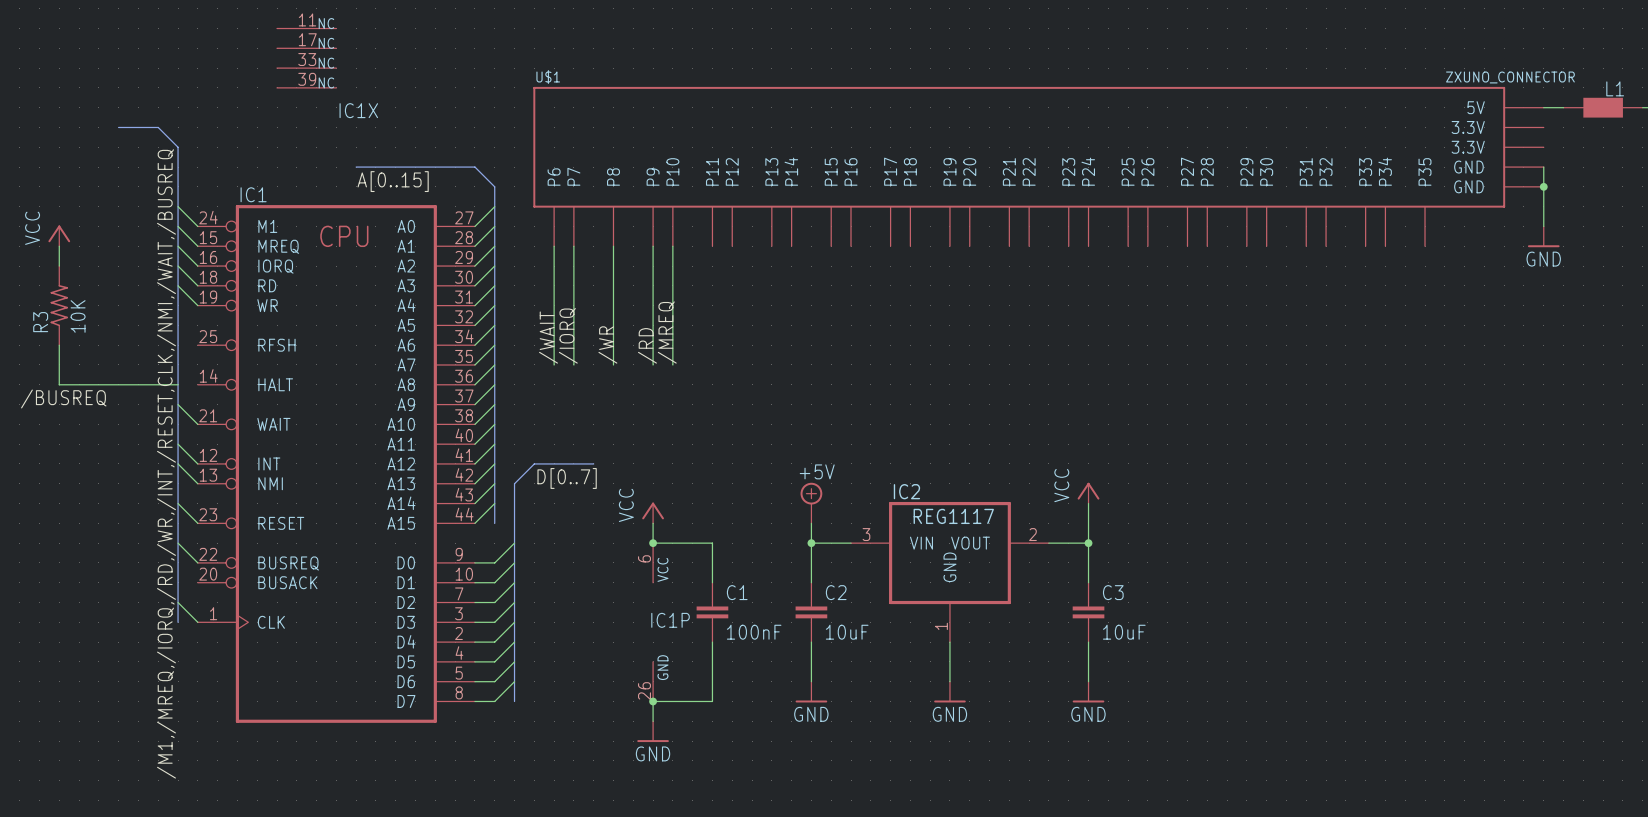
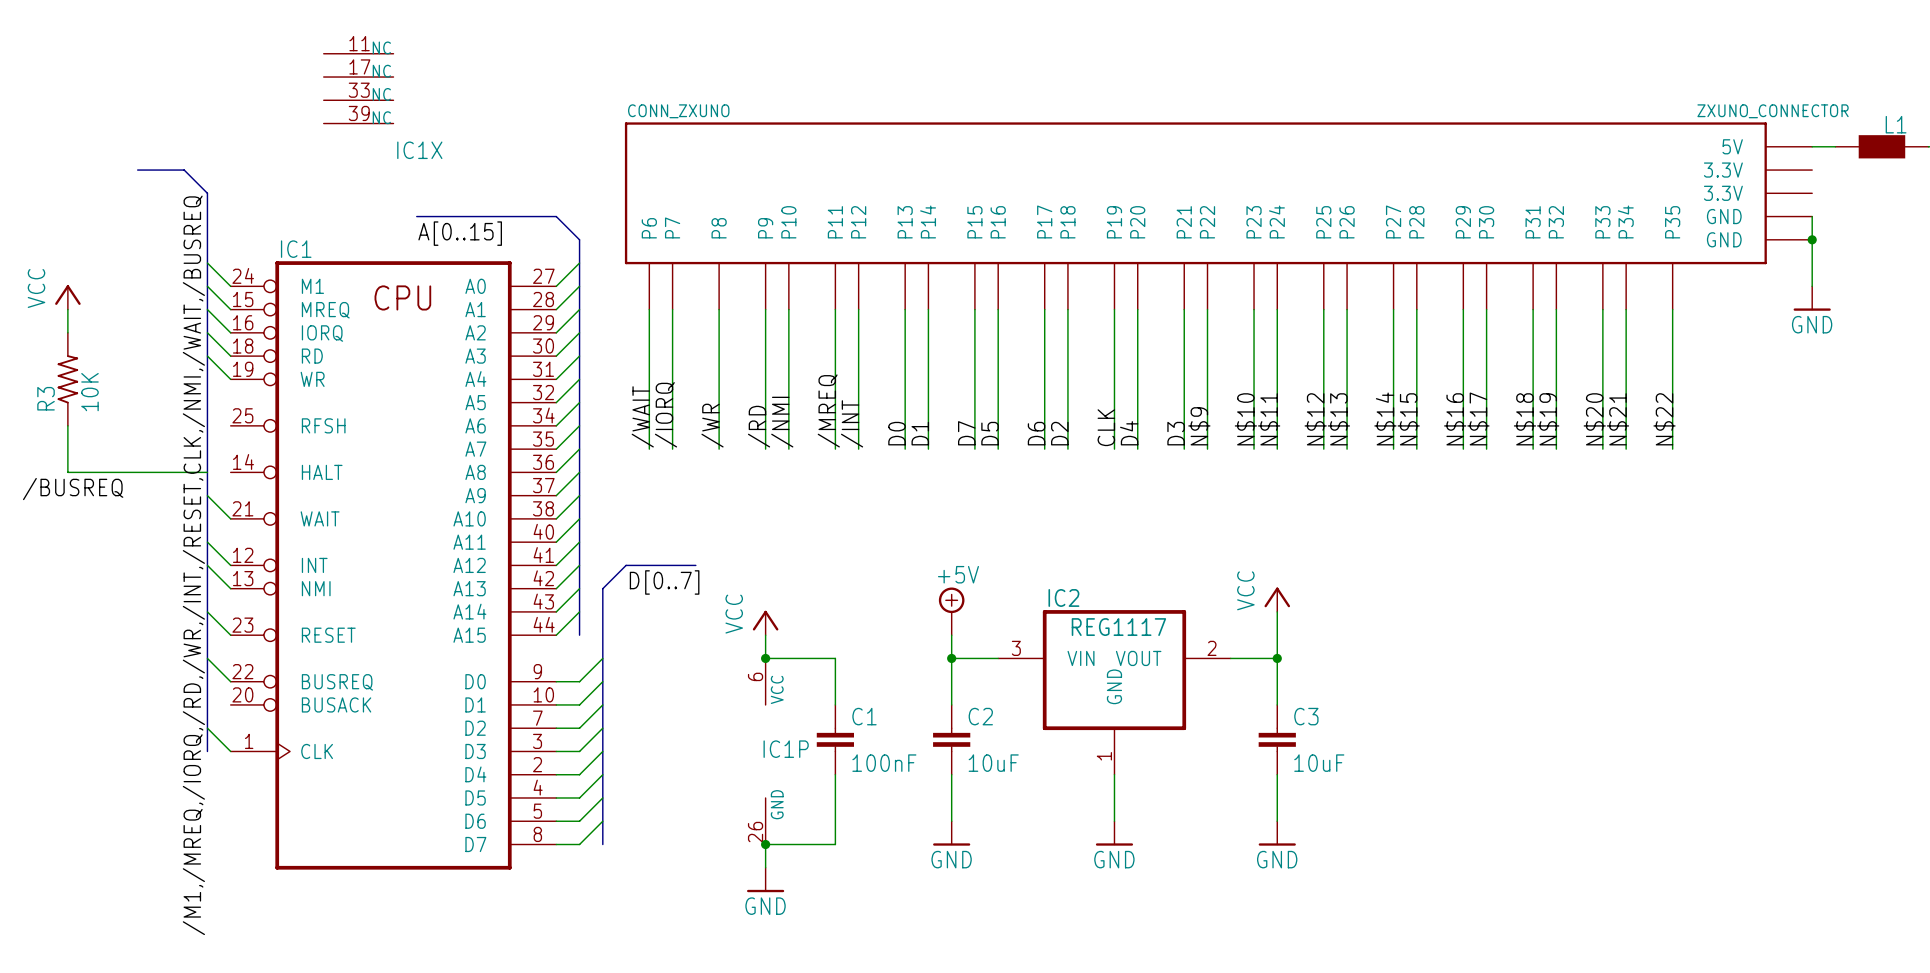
U$1 name: U$1 (548, 77) -> CONN_ZXUNO (678, 111)
wire: none -> (835, 309) (835, 449)
wire: none -> (858, 309) (858, 449)
wire: none -> (905, 309) (905, 449)
wire: none -> (928, 309) (928, 449)
wire: none -> (974, 309) (974, 449)
wire: none -> (998, 309) (998, 449)
wire: none -> (1044, 309) (1044, 449)
wire: none -> (1067, 309) (1067, 449)
wire: none -> (1114, 309) (1114, 449)
wire: none -> (1137, 309) (1137, 449)
wire: none -> (1184, 309) (1184, 449)
wire: none -> (1207, 309) (1207, 449)
wire: none -> (1254, 309) (1254, 449)
wire: none -> (1277, 309) (1277, 449)
wire: none -> (1323, 309) (1323, 449)
wire: none -> (1347, 309) (1347, 449)
wire: none -> (1393, 309) (1393, 449)
wire: none -> (1416, 309) (1416, 449)
wire: none -> (1463, 309) (1463, 449)
wire: none -> (1486, 309) (1486, 449)
wire: none -> (1533, 309) (1533, 449)
wire: none -> (1556, 309) (1556, 449)
wire: none -> (1602, 309) (1602, 449)
wire: none -> (1626, 309) (1626, 449)
wire: none -> (1672, 309) (1672, 449)
label: /MREQ (667, 332) -> /NMI (782, 422)
label: none -> /MREQ (828, 410)
label: none -> N$10 (1245, 419)
label: none -> N$11 (1269, 419)
label: none -> N$12 (1315, 419)
label: none -> N$13 (1338, 419)
label: none -> N$14 (1385, 418)
label: none -> N$15 (1408, 419)
label: none -> N$16 (1455, 419)
label: none -> N$17 (1478, 418)
label: none -> N$18 (1524, 419)
label: none -> N$19 (1548, 419)
label: none -> N$20 (1594, 419)
label: none -> N$21 (1617, 419)
label: none -> N$22 (1664, 419)
label: none -> /INT (852, 423)
label: none -> N$9 (1199, 426)
label: none -> CLK (1106, 427)
label: none -> D0 (897, 433)
label: none -> D1 (920, 433)
label: none -> D7 (966, 433)
label: none -> D5 (990, 433)
label: none -> D6 (1036, 433)
label: none -> D2 (1059, 433)
label: none -> D4 (1129, 433)
label: none -> D3 (1176, 433)

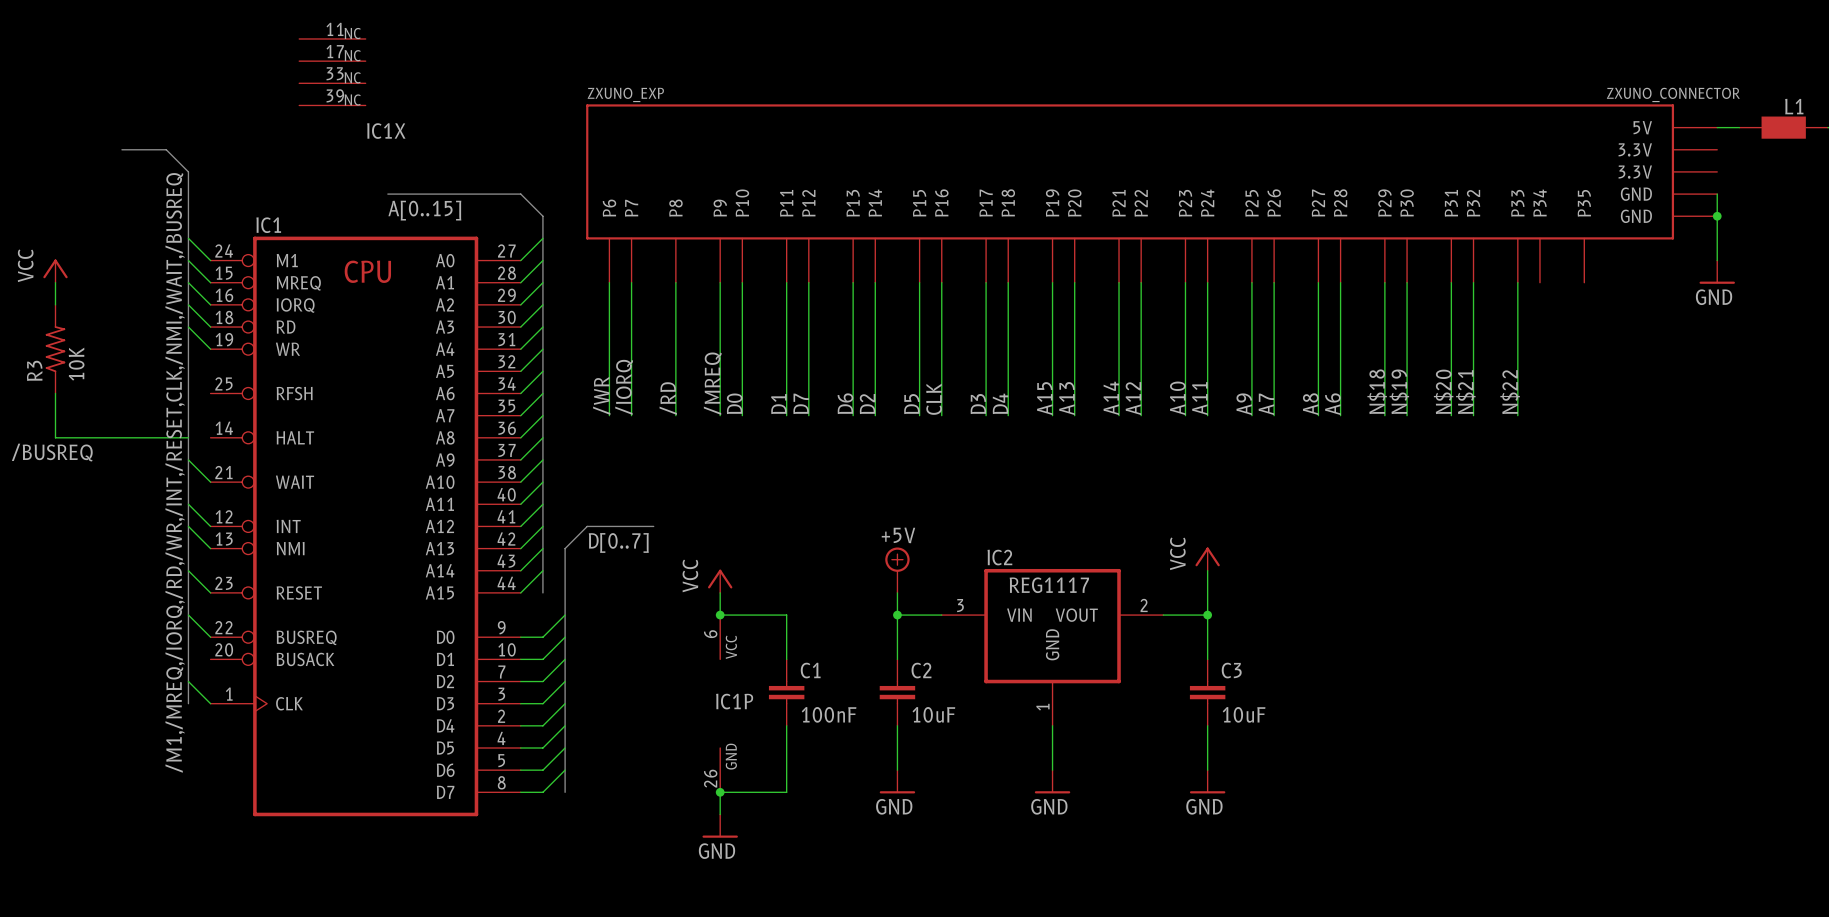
CONN_ZXUNO name: CONN_ZXUNO (678, 111) -> ZXUNO_EXP (625, 94)
wire: (1626, 309) (1626, 449) -> none
wire: (1672, 309) (1672, 449) -> none
label: /MREQ (828, 410) -> D1 (778, 404)
label: /WAIT (642, 416) -> /WR (601, 395)
label: N$14 (1385, 418) -> A8 (1310, 404)
label: N$17 (1478, 418) -> N$19 (1399, 391)
label: N$10 (1245, 419) -> A10 (1177, 398)
label: N$11 (1269, 419) -> A11 (1199, 398)
label: N$12 (1315, 419) -> A9 (1244, 404)
label: N$13 (1338, 419) -> A7 (1266, 404)
label: N$15 (1408, 419) -> A6 (1332, 404)
label: N$16 (1455, 419) -> N$18 (1377, 391)
label: N$18 (1524, 419) -> N$20 (1443, 391)
label: N$19 (1548, 419) -> N$21 (1465, 392)
label: N$20 (1594, 419) -> N$22 (1510, 392)
label: N$21 (1617, 419) -> none
label: N$22 (1664, 419) -> none
label: /NMI (782, 422) -> D0 (734, 403)
label: /INT (852, 423) -> D7 (801, 403)
label: /WR (712, 425) -> /RD (668, 398)
label: /RD (759, 426) -> /MREQ (712, 383)
label: N$9 (1199, 426) -> A12 (1133, 398)
label: CLK (1106, 427) -> A15 (1044, 398)
label: D0 (897, 433) -> D6 (845, 403)
label: D1 (920, 433) -> D2 (867, 404)
label: D7 (966, 433) -> D5 (911, 404)
label: D5 (990, 433) -> CLK (934, 399)
label: D6 (1036, 433) -> D3 (978, 404)
label: D2 (1059, 433) -> D4 (1000, 403)
label: D4 (1129, 433) -> A13 (1066, 398)
label: D3 (1176, 433) -> A14 (1111, 398)

